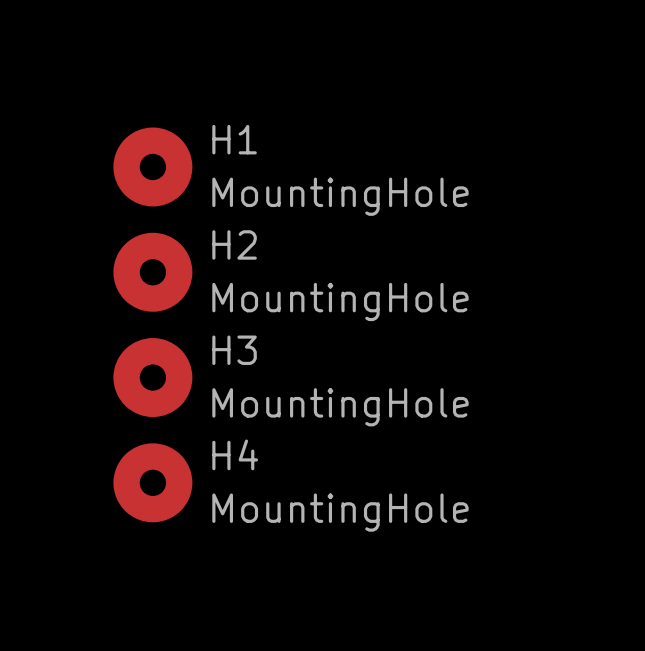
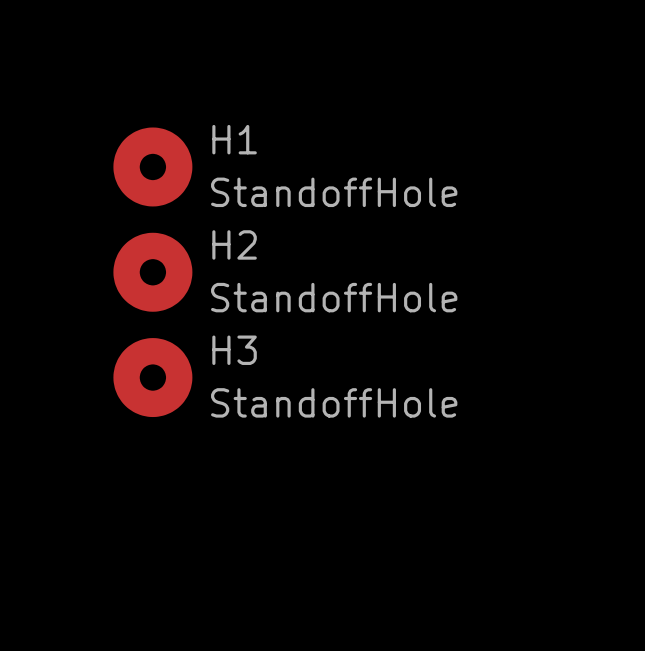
H1 value: MountingHole (340, 196) -> StandoffHole (334, 192)
H2 value: MountingHole (340, 301) -> StandoffHole (334, 297)
H3 value: MountingHole (340, 407) -> StandoffHole (334, 402)
H4: MountingHole (152, 482) -> none

